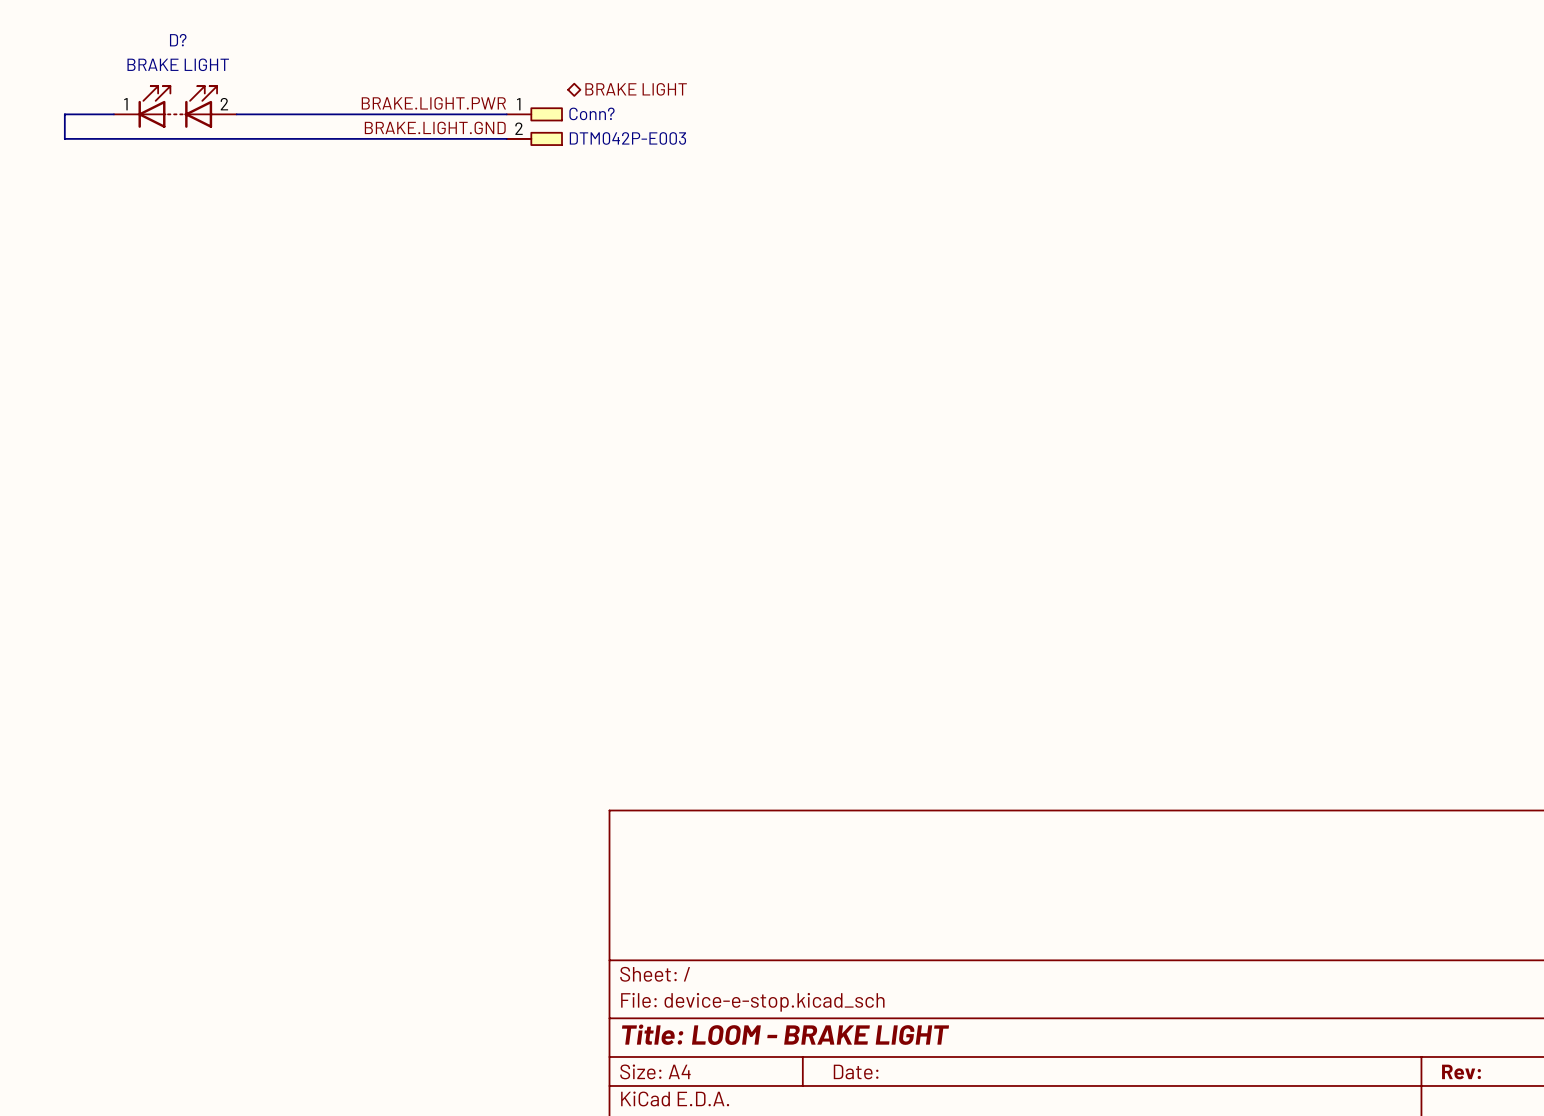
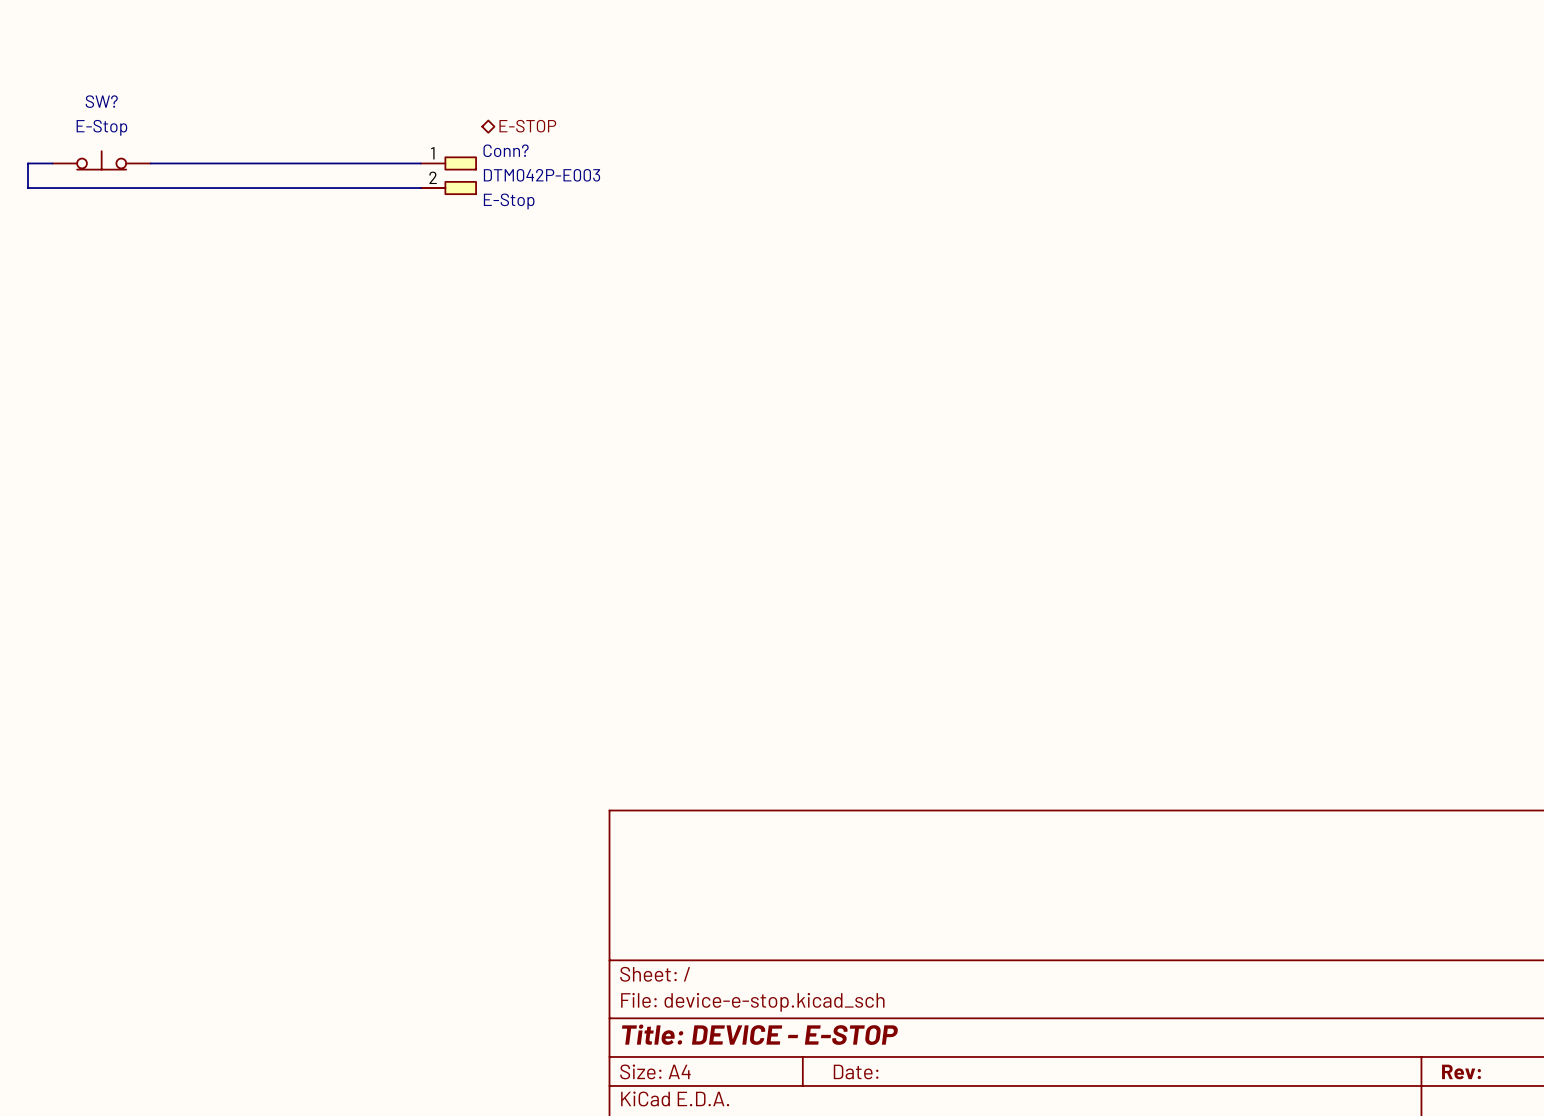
hierarchical label: BRAKE LIGHT (636, 89) -> none
label: BRAKE.LIGHT.PWR (433, 103) -> none
D?: BRAKE LIGHT (175, 107) -> none
wire: (113, 114) (64, 114) (64, 138) (506, 138) -> none
wire: (236, 114) (506, 114) -> (150, 163) (420, 163)
hierarchical label: none -> E-STOP (527, 126)
Conn?: (534, 126) -> none
label: BRAKE.LIGHT.GND (435, 127) -> none
SW?: none -> E-Stop (101, 160)
wire: none -> (52, 163) (28, 163) (28, 188) (420, 188)
Conn?: none -> (448, 175)
title block: Title: LOOM - BRAKE LIGHT (785, 1034) -> Title: DEVICE - E-STOP (759, 1034)

